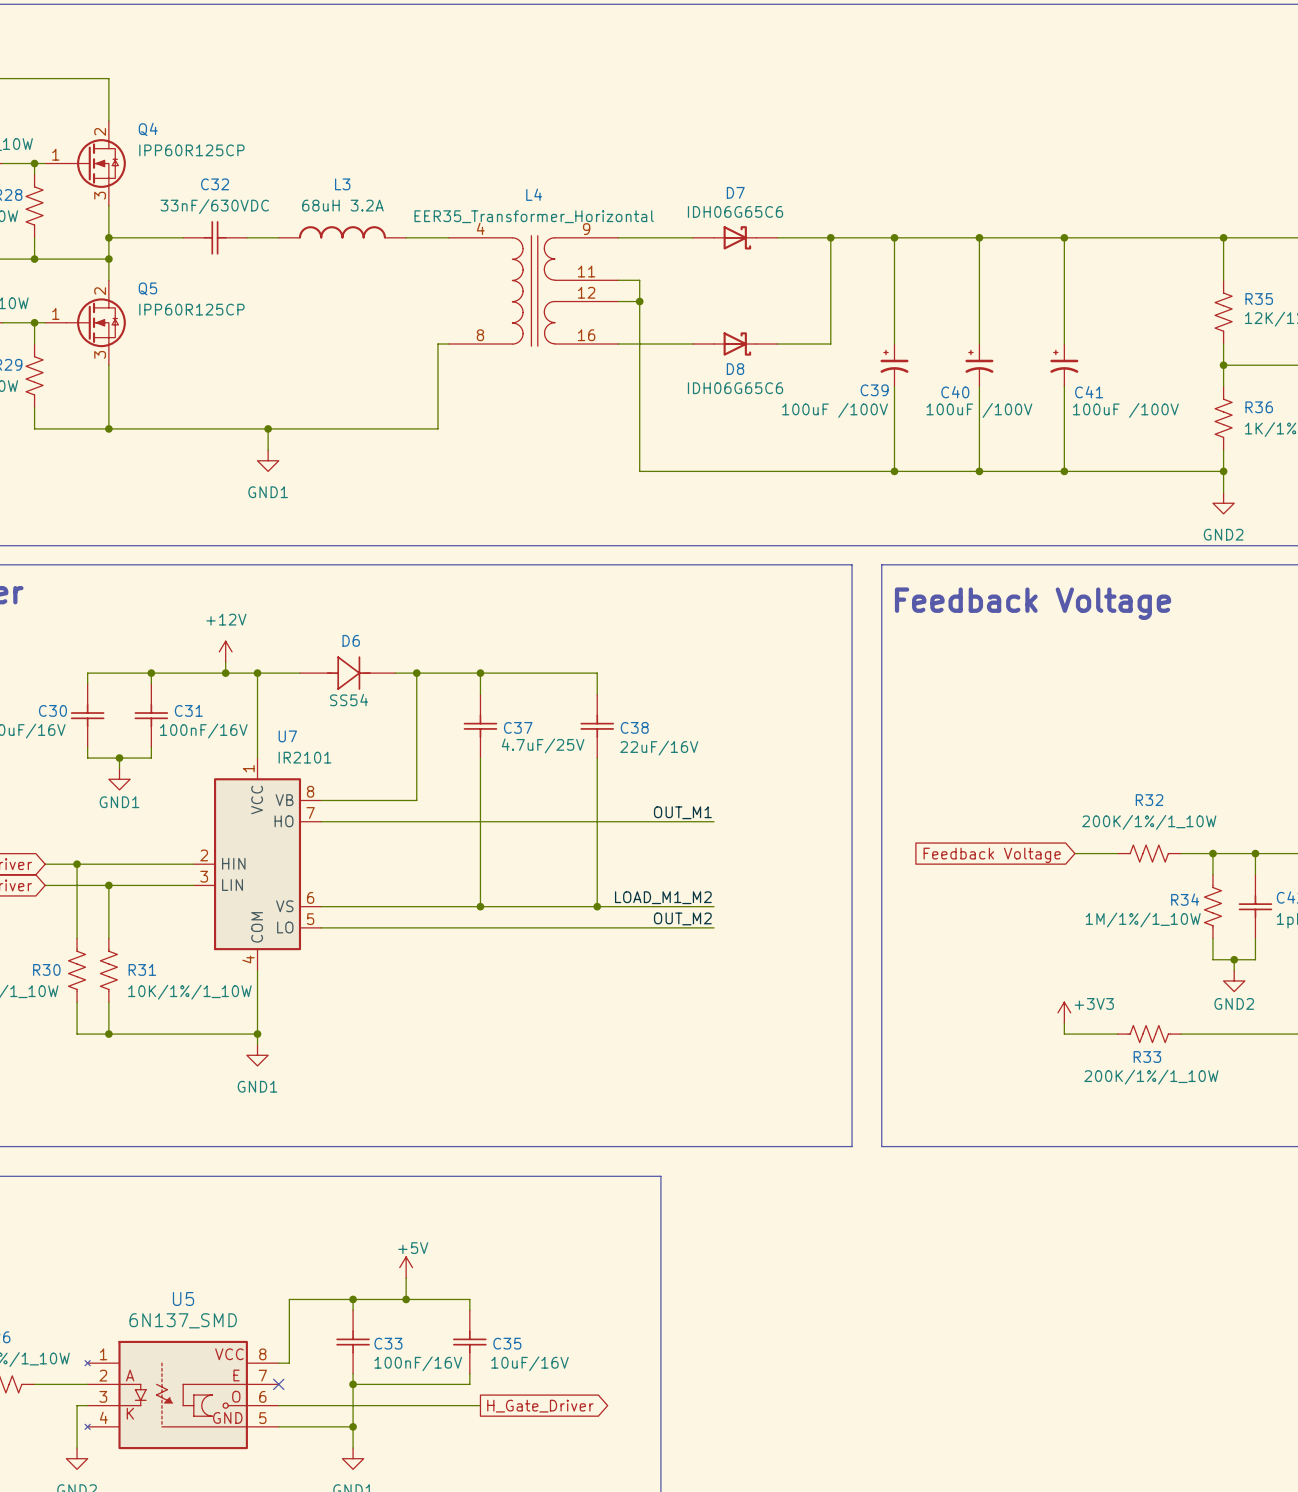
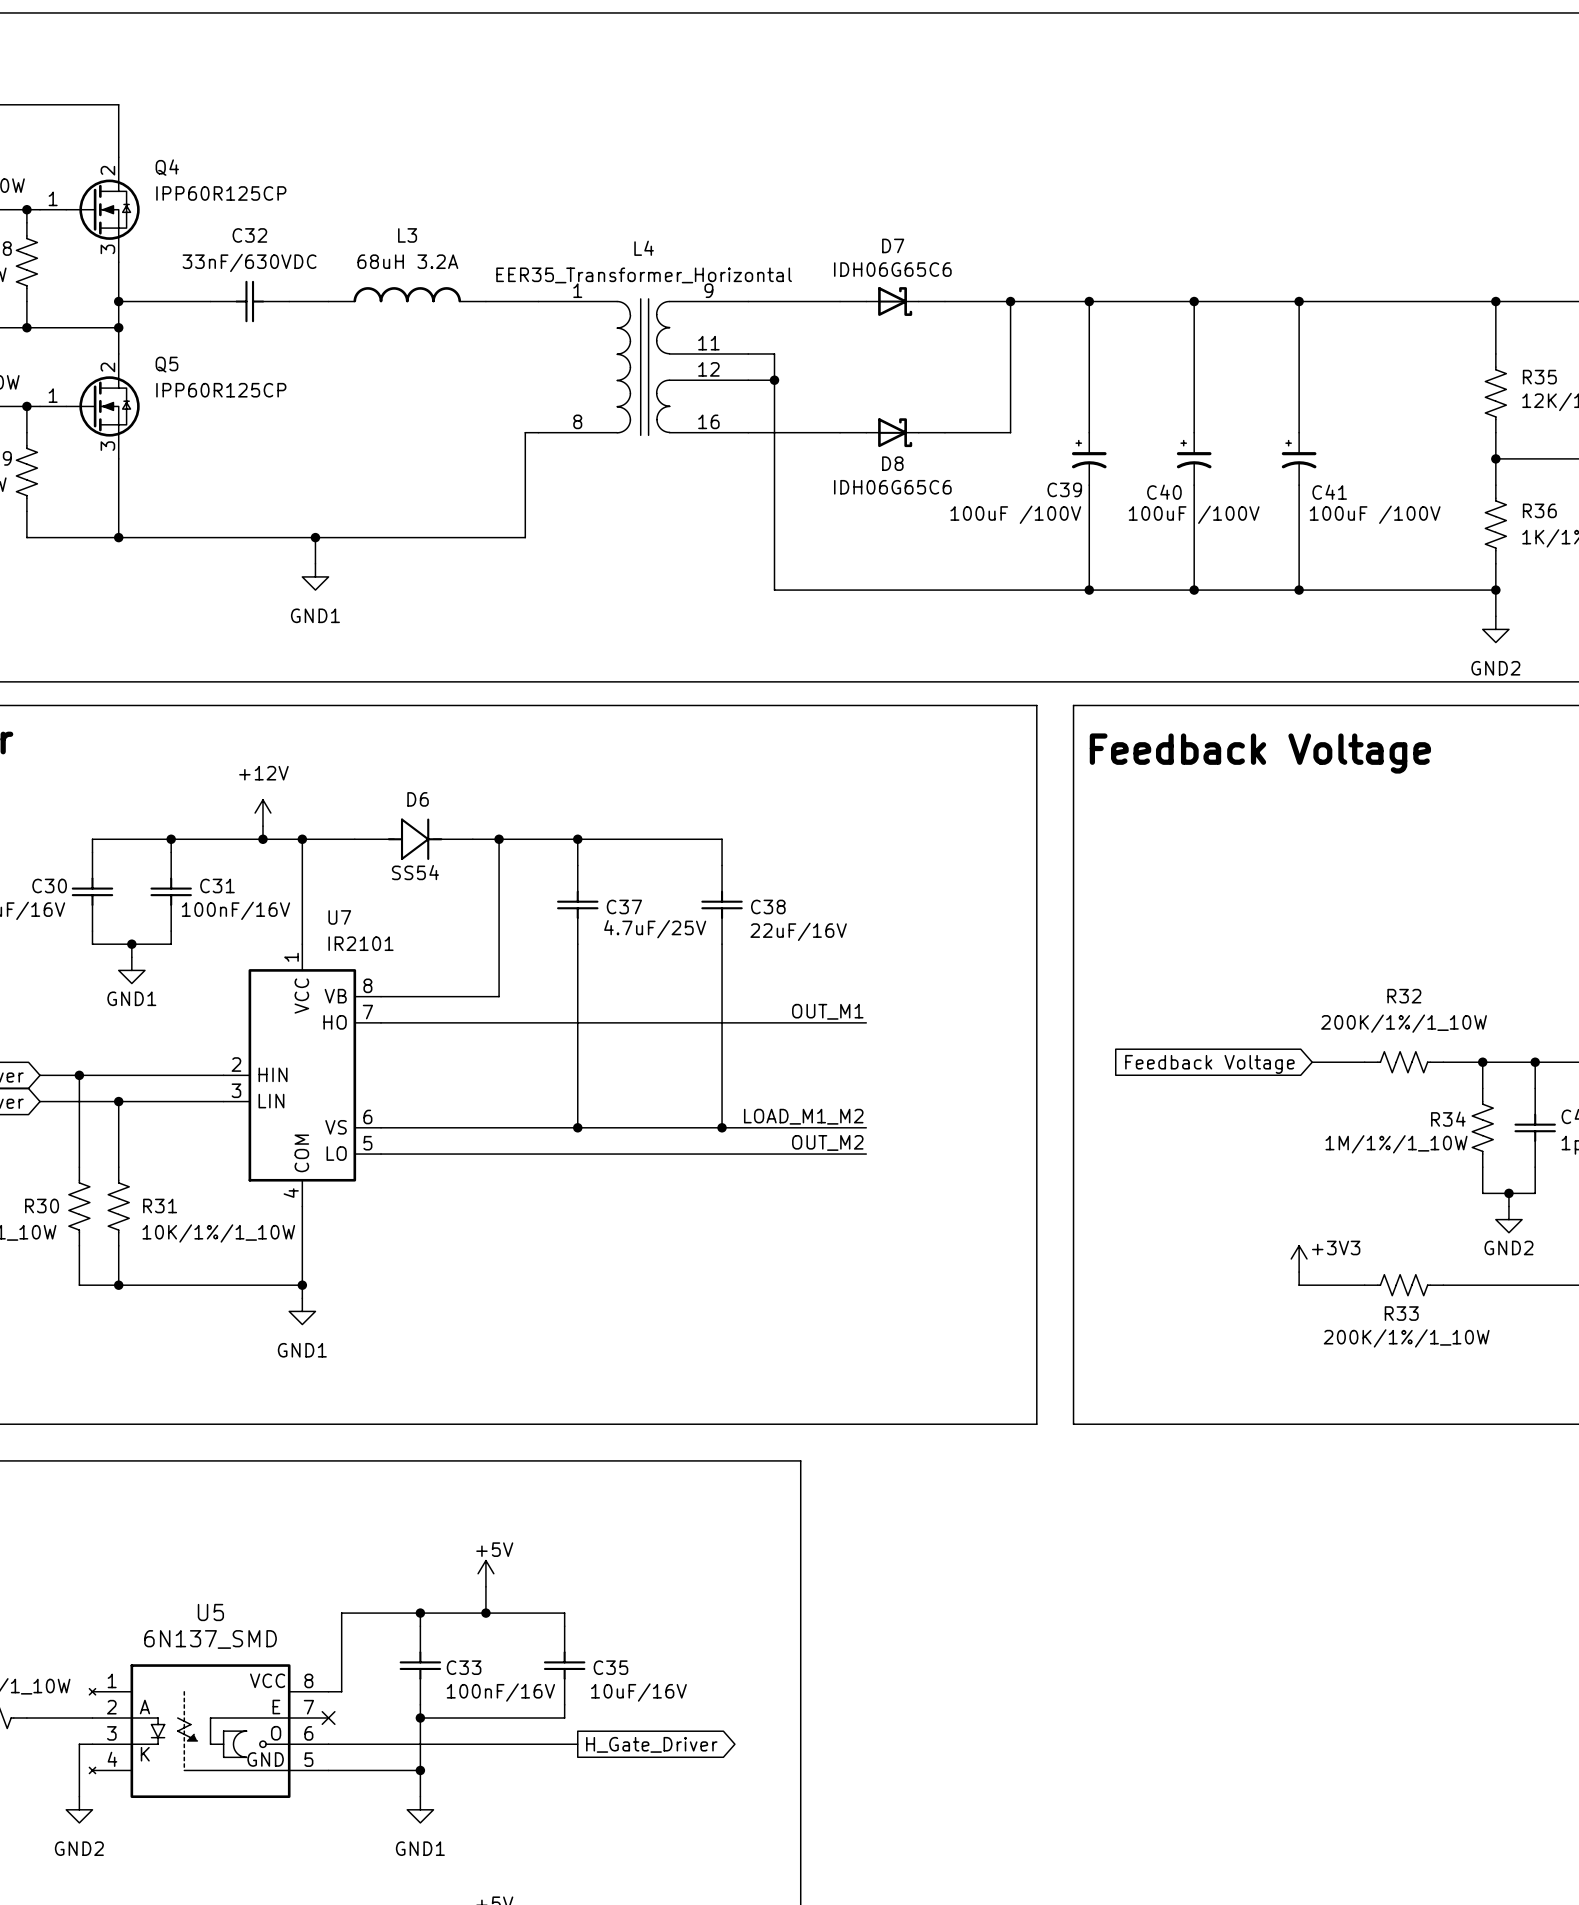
L4 pin number: 4 (480, 228) -> 1 (577, 290)

